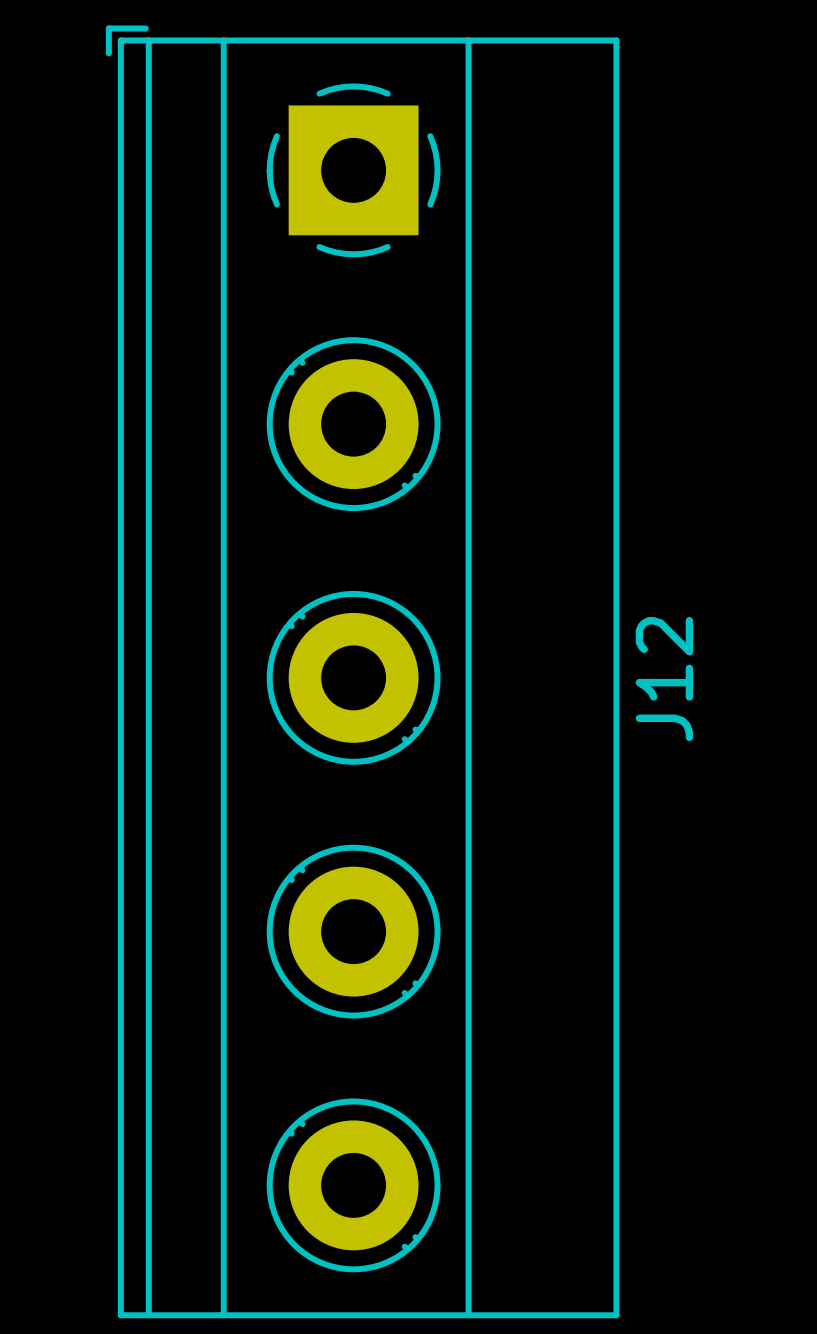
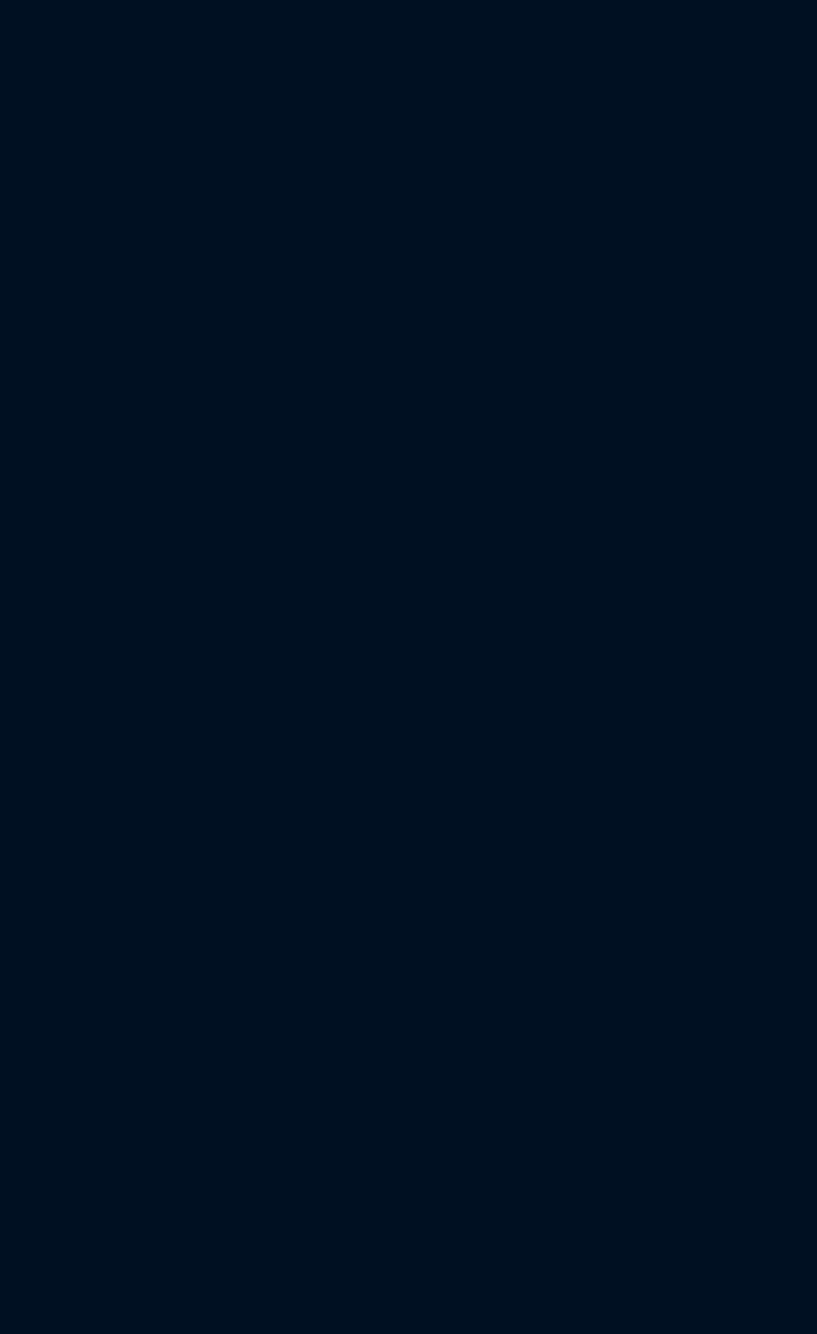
J12: (362, 671) -> none

